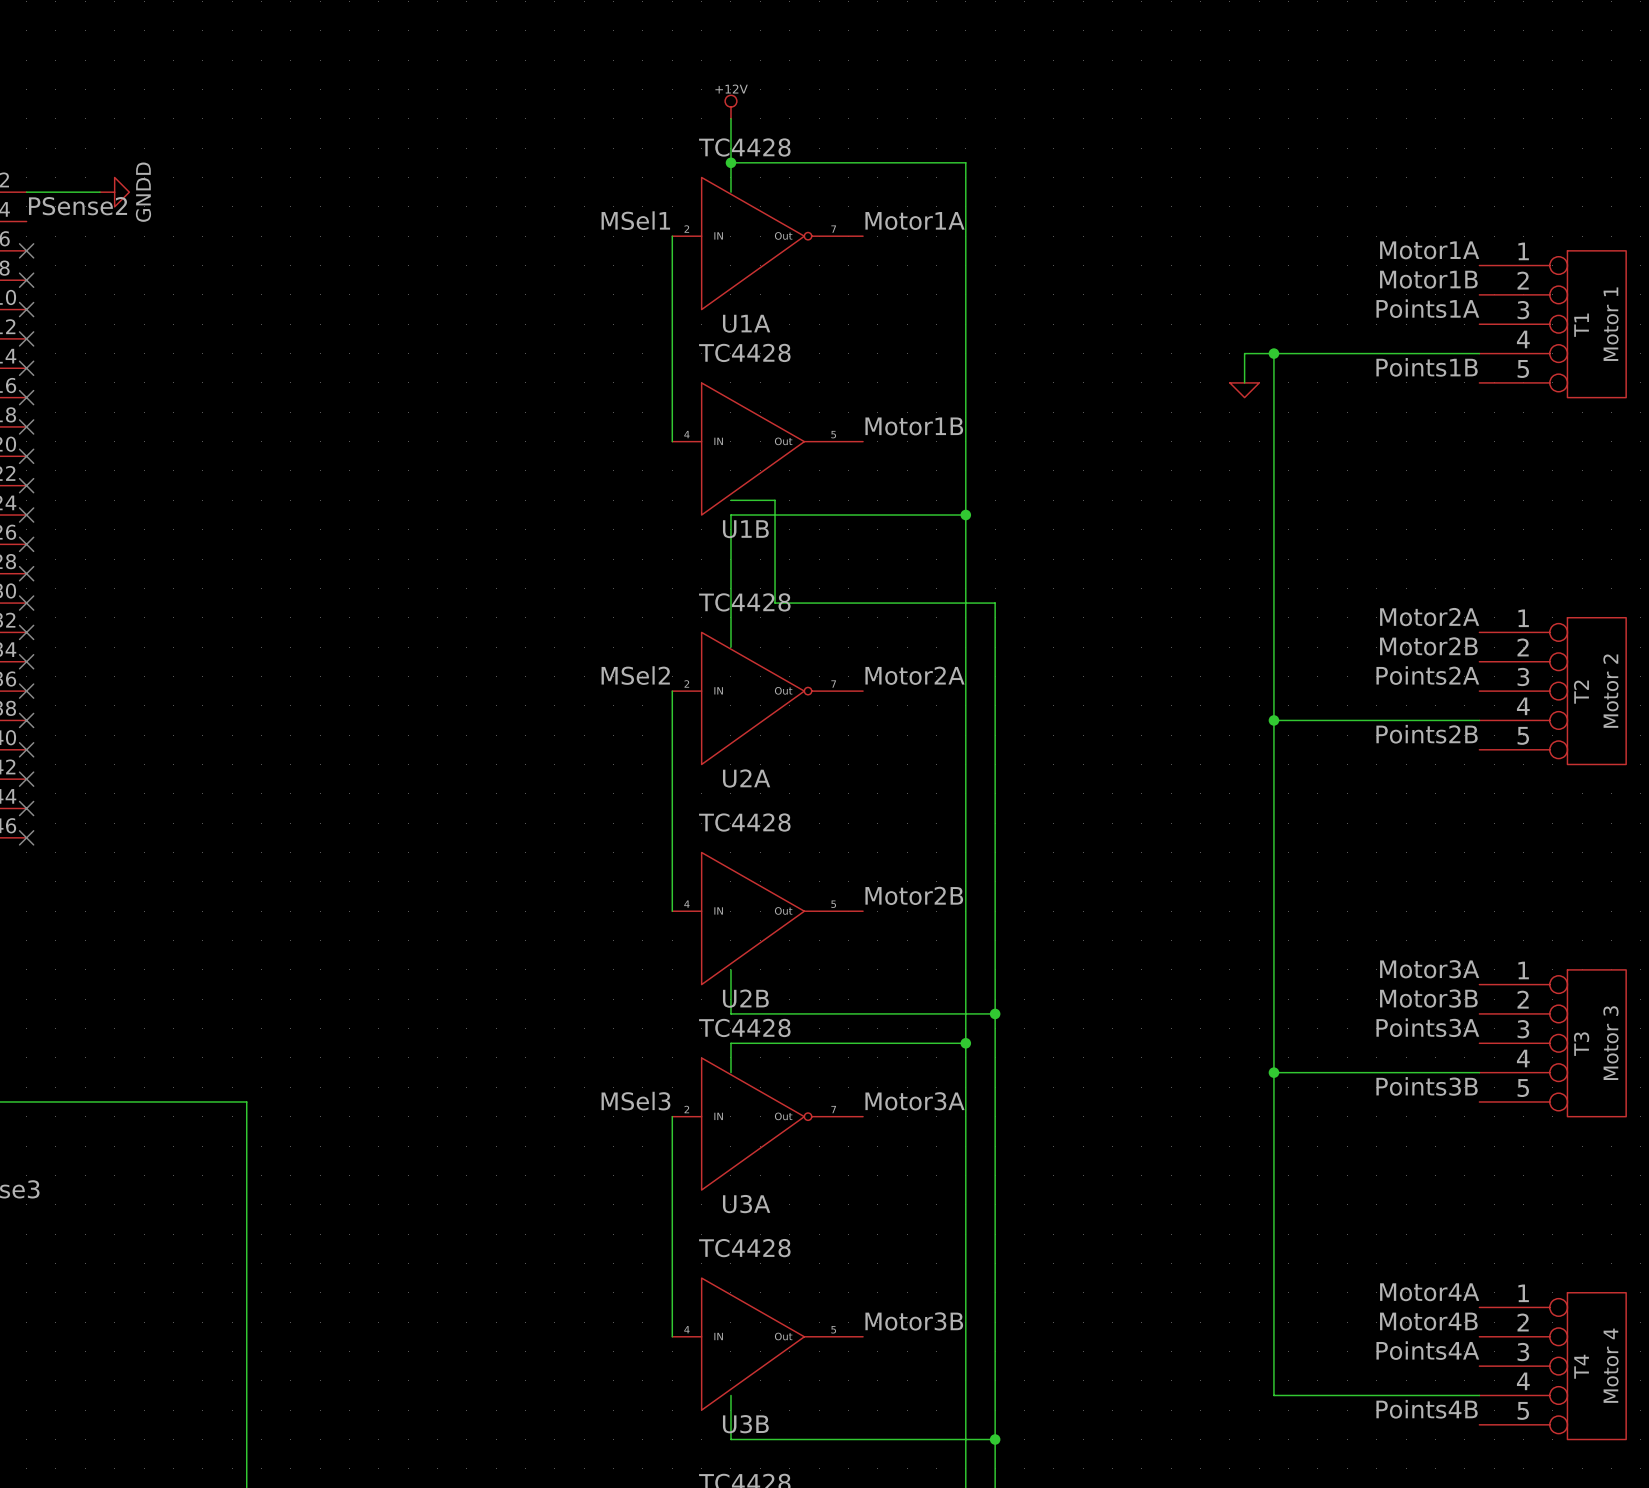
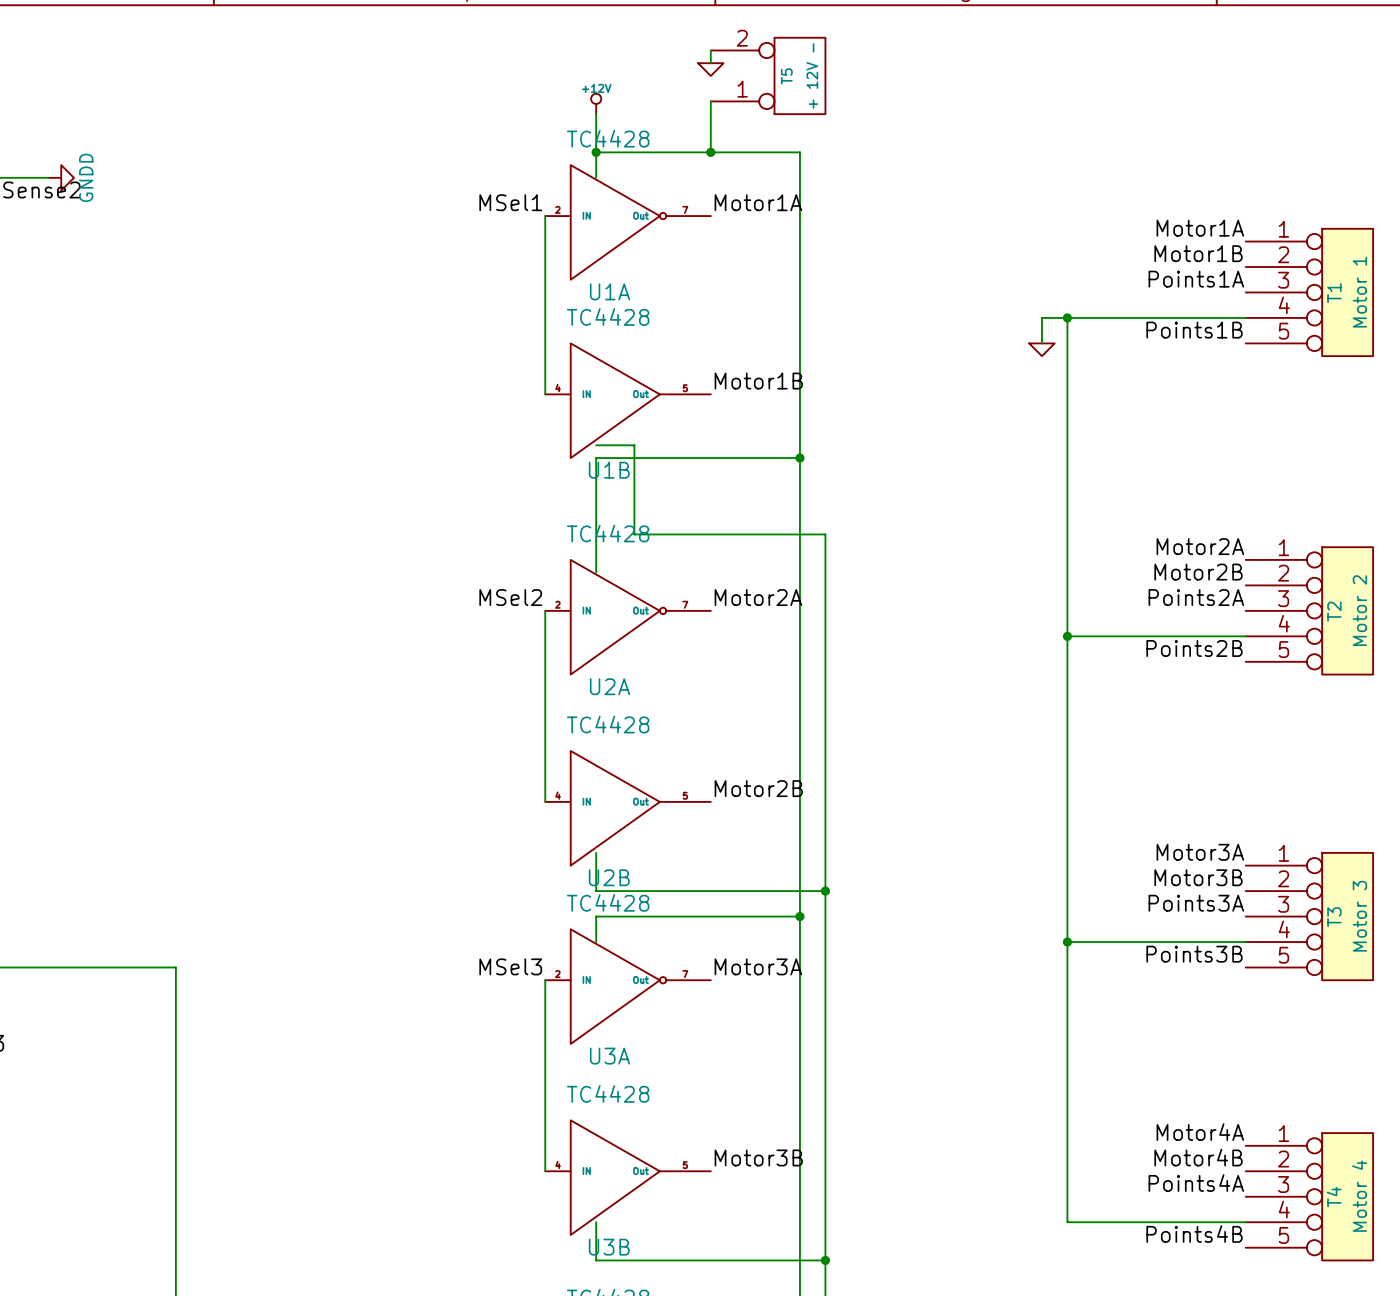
wire: none -> (710, 50) (710, 63)
power symbol: none -> (710, 69)
T5: none -> + 12V - (768, 75)
wire: none -> (710, 101) (710, 152)
junction: none -> (710, 152)

